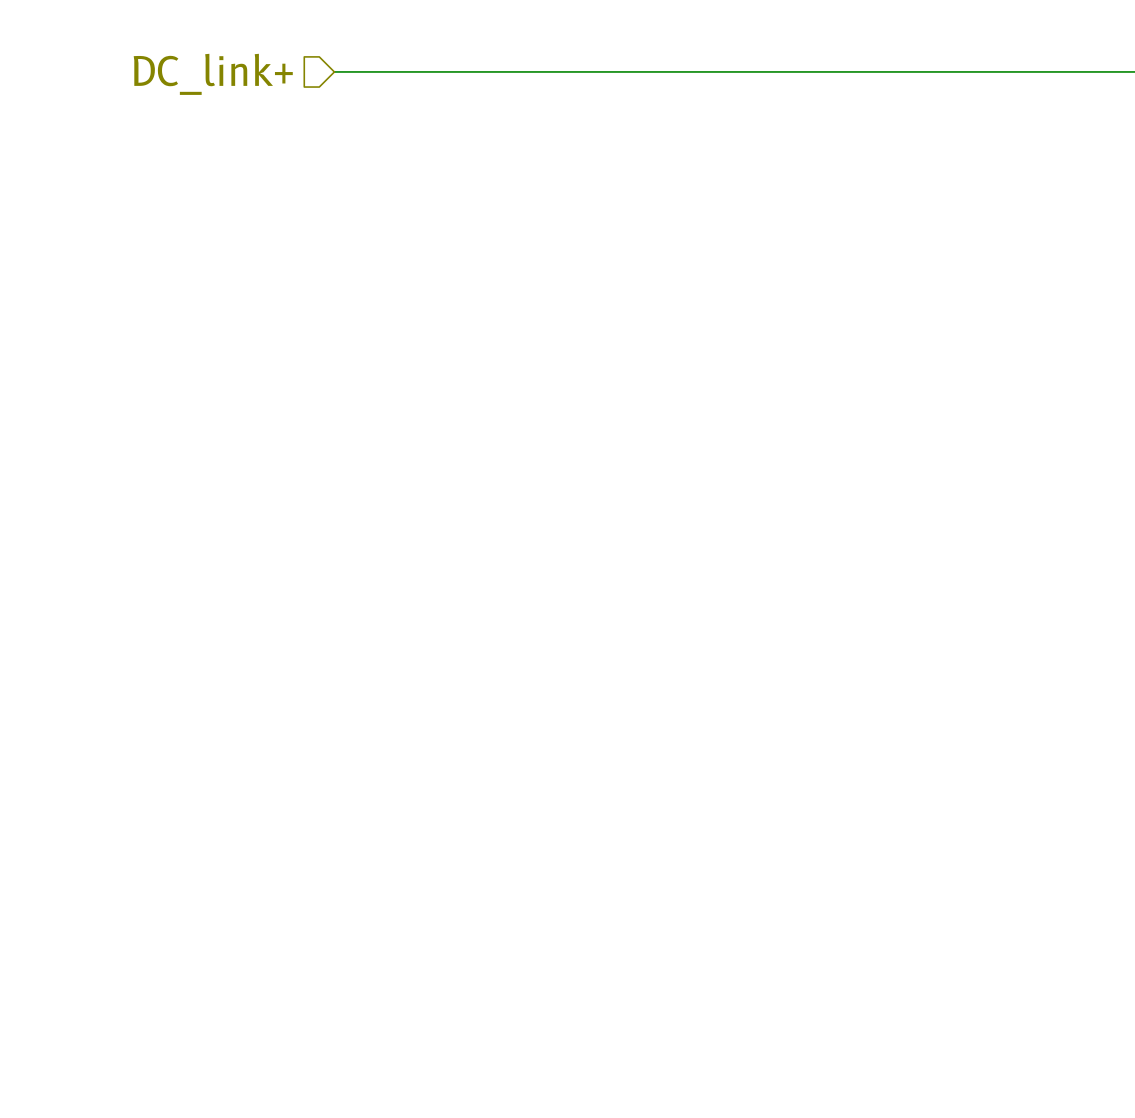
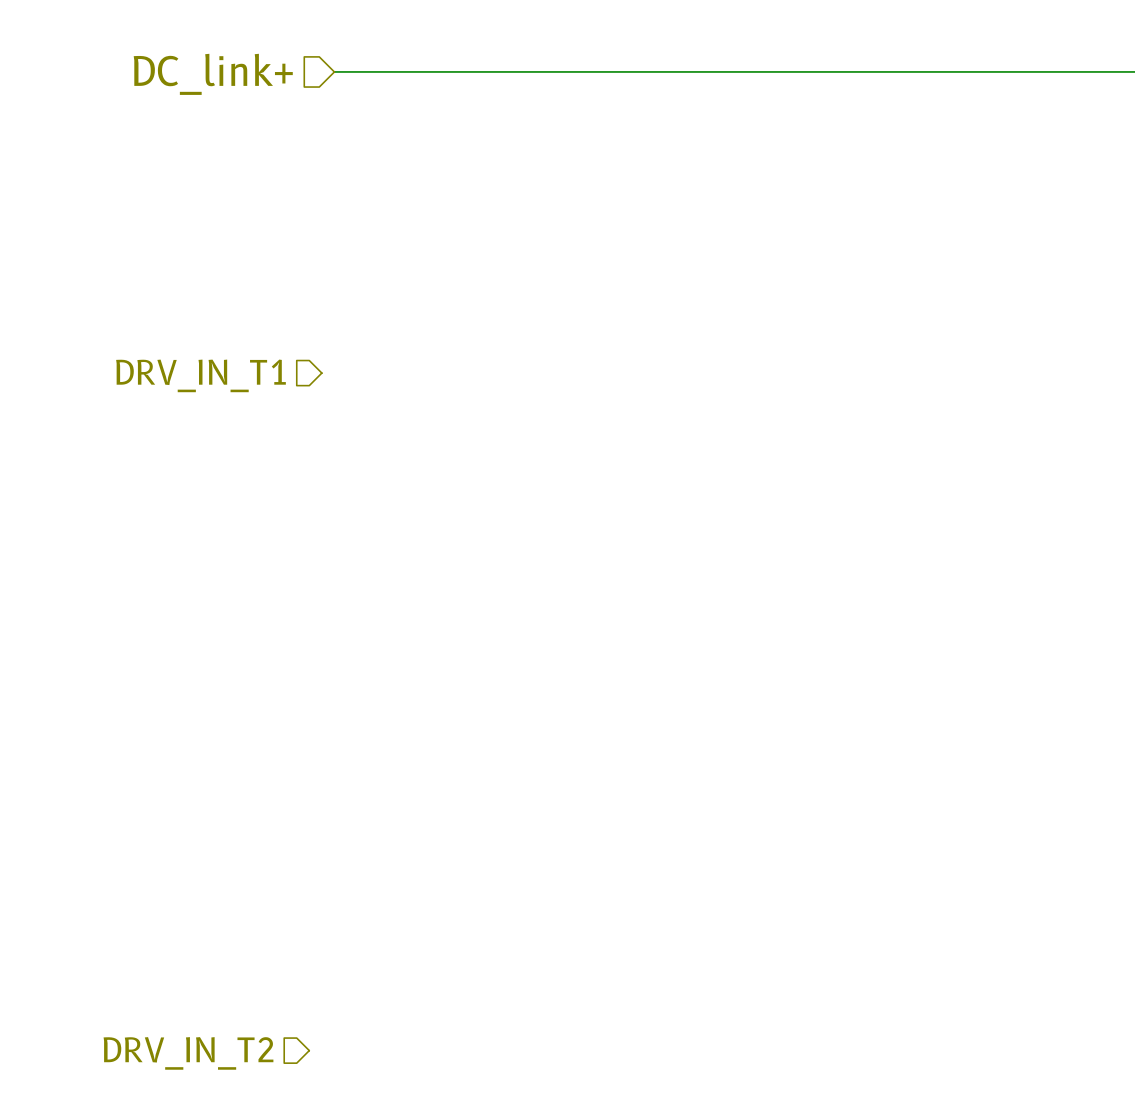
hierarchical label: none -> DRV_IN_T1 (200, 375)
hierarchical label: none -> DRV_IN_T2 (188, 1053)

